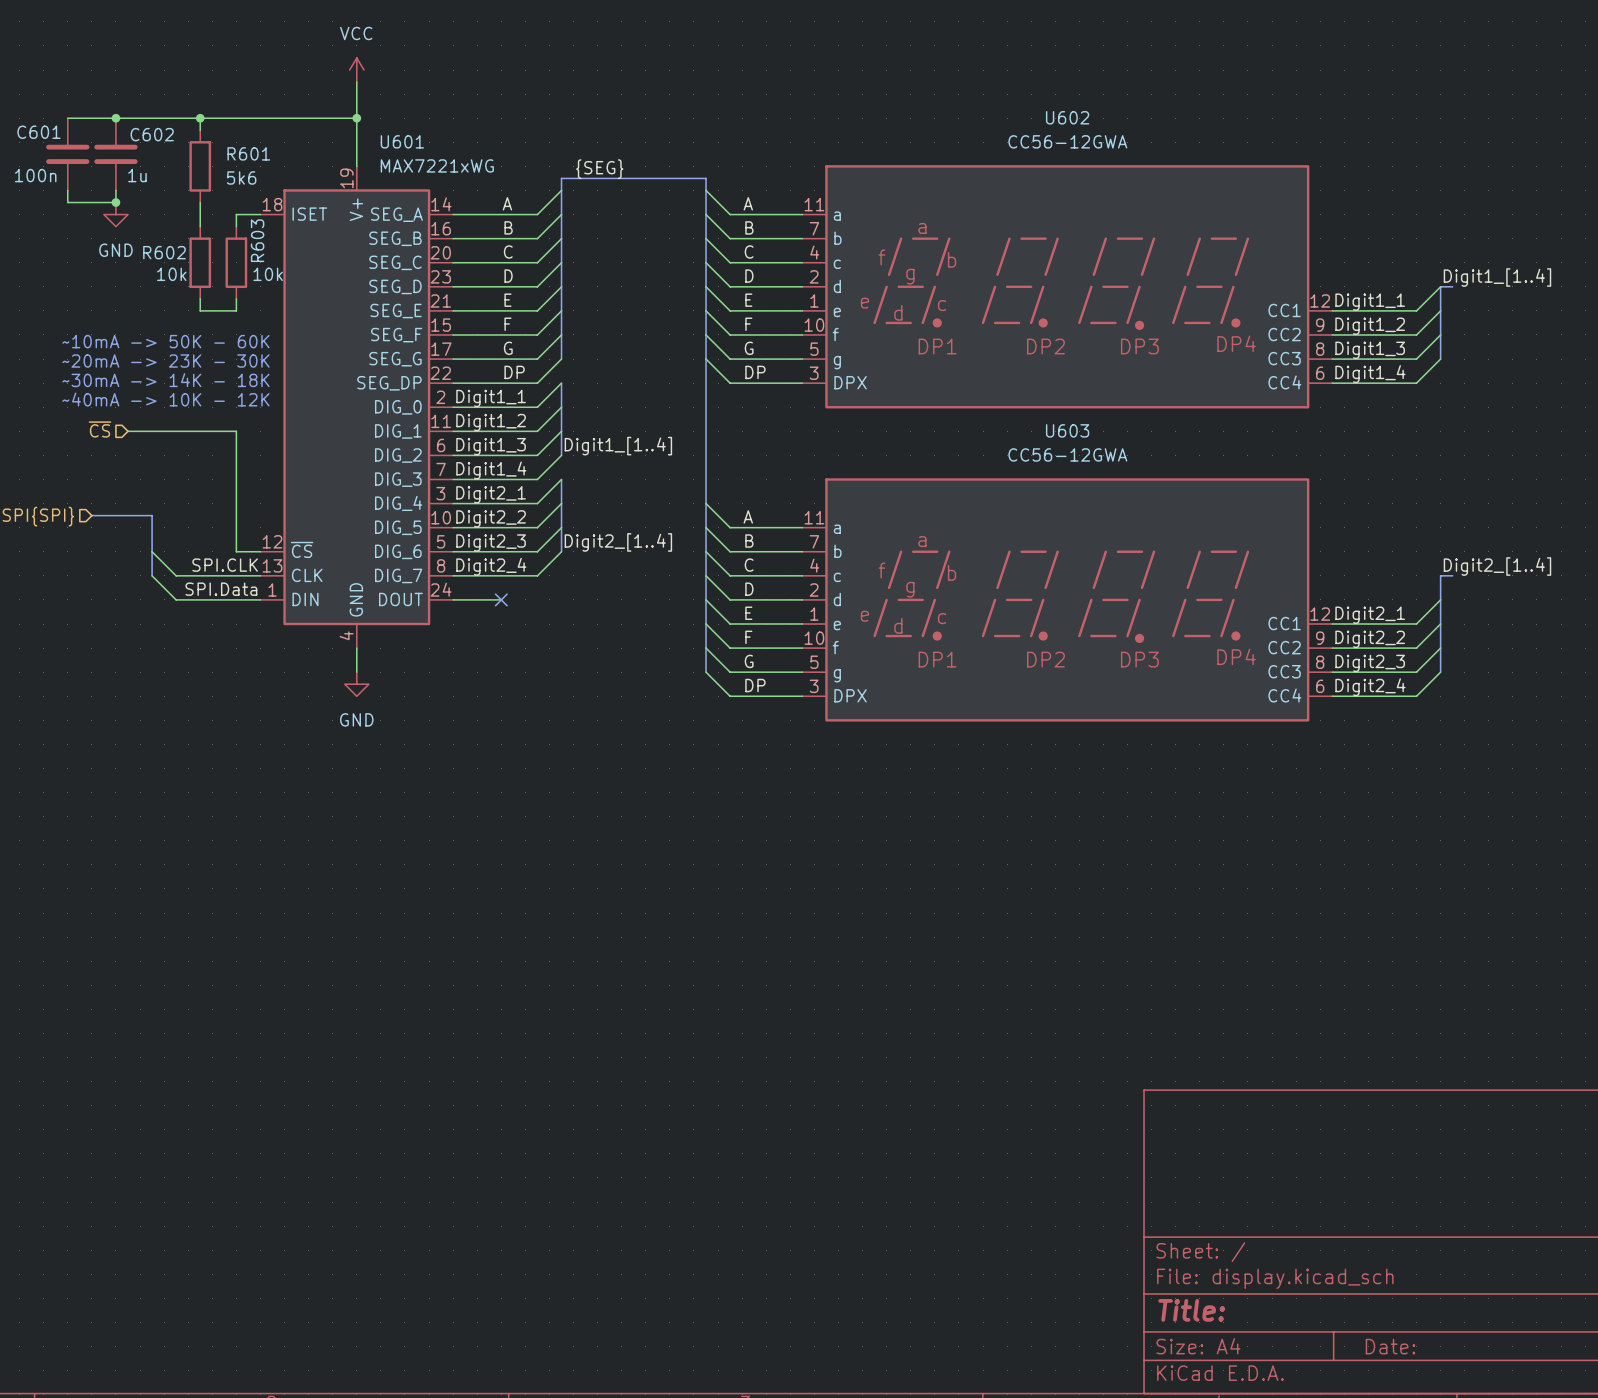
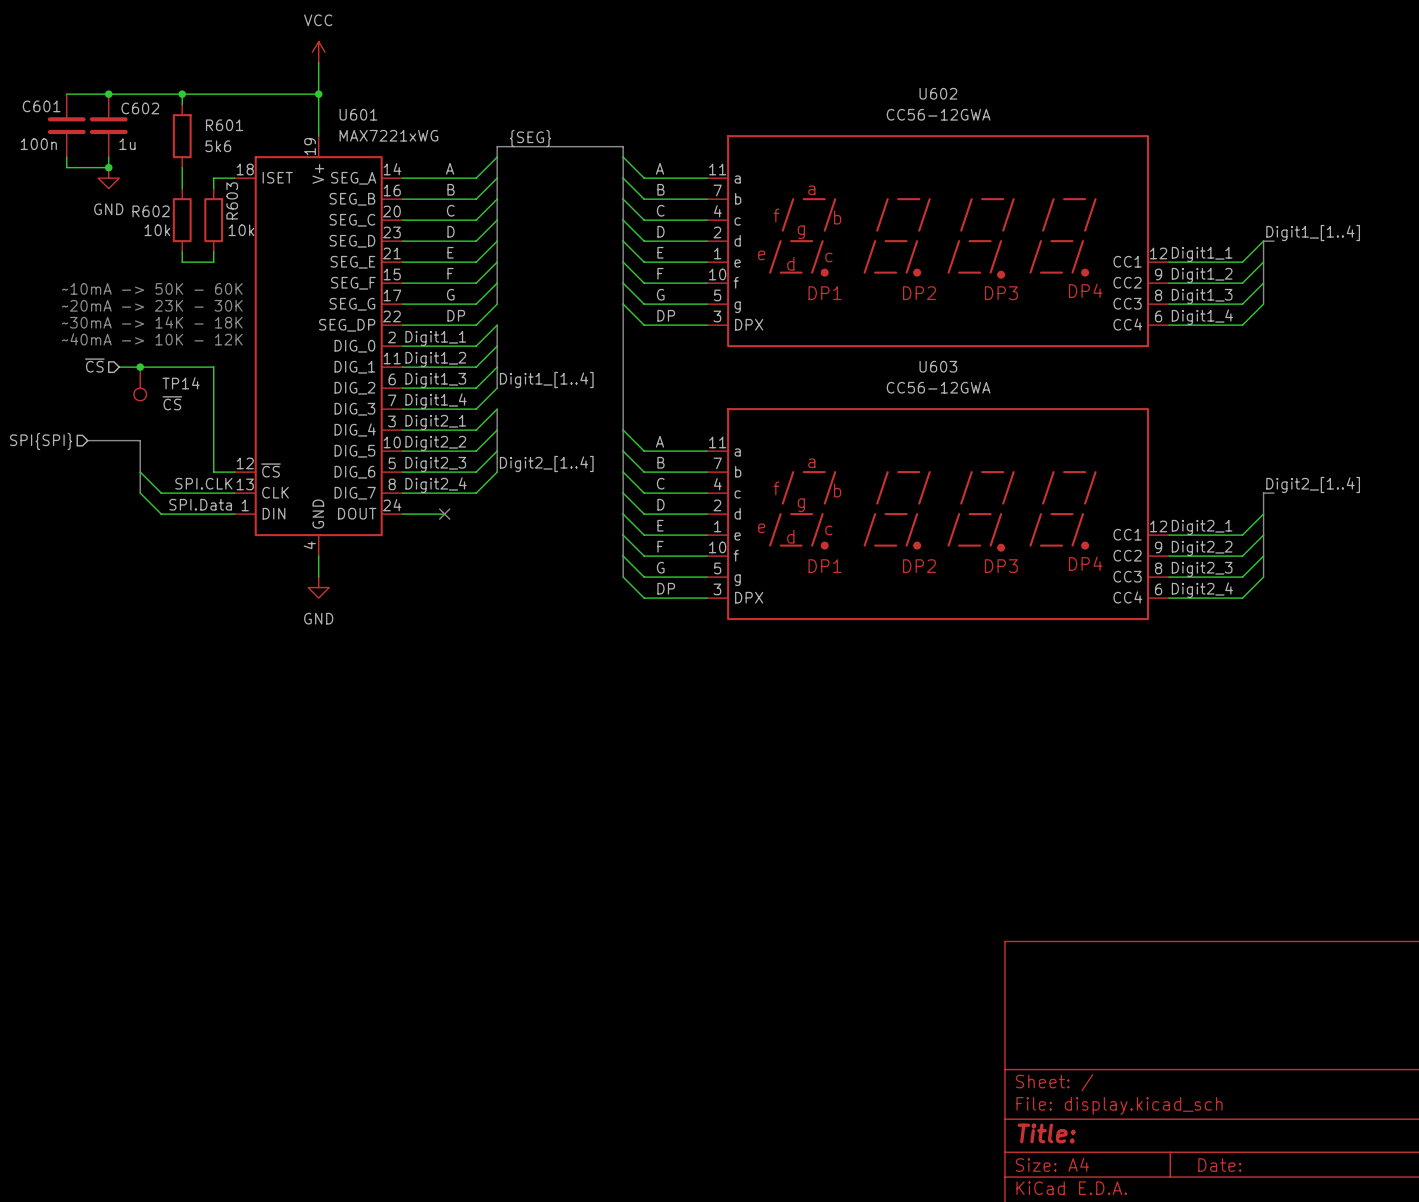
junction: none -> (140, 367)
TP14: none -> ~{CS} (140, 383)

